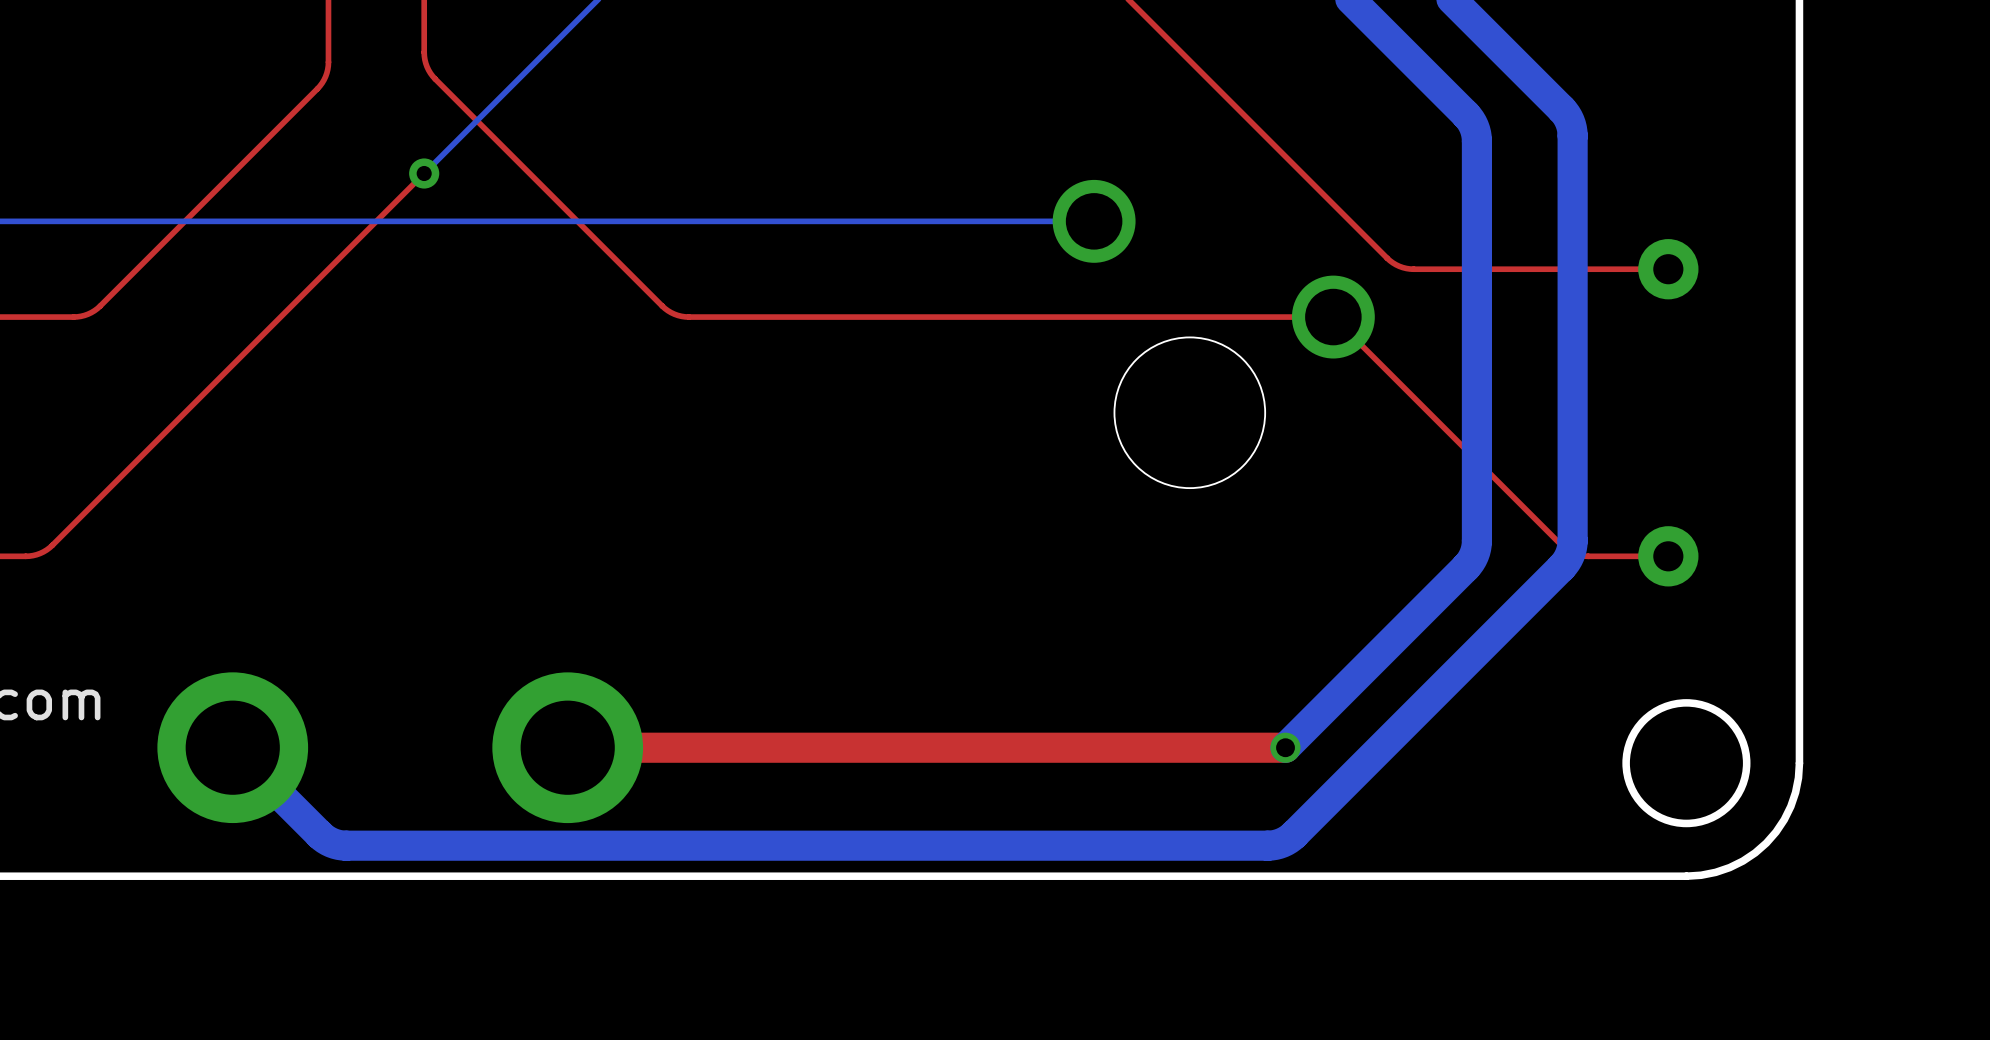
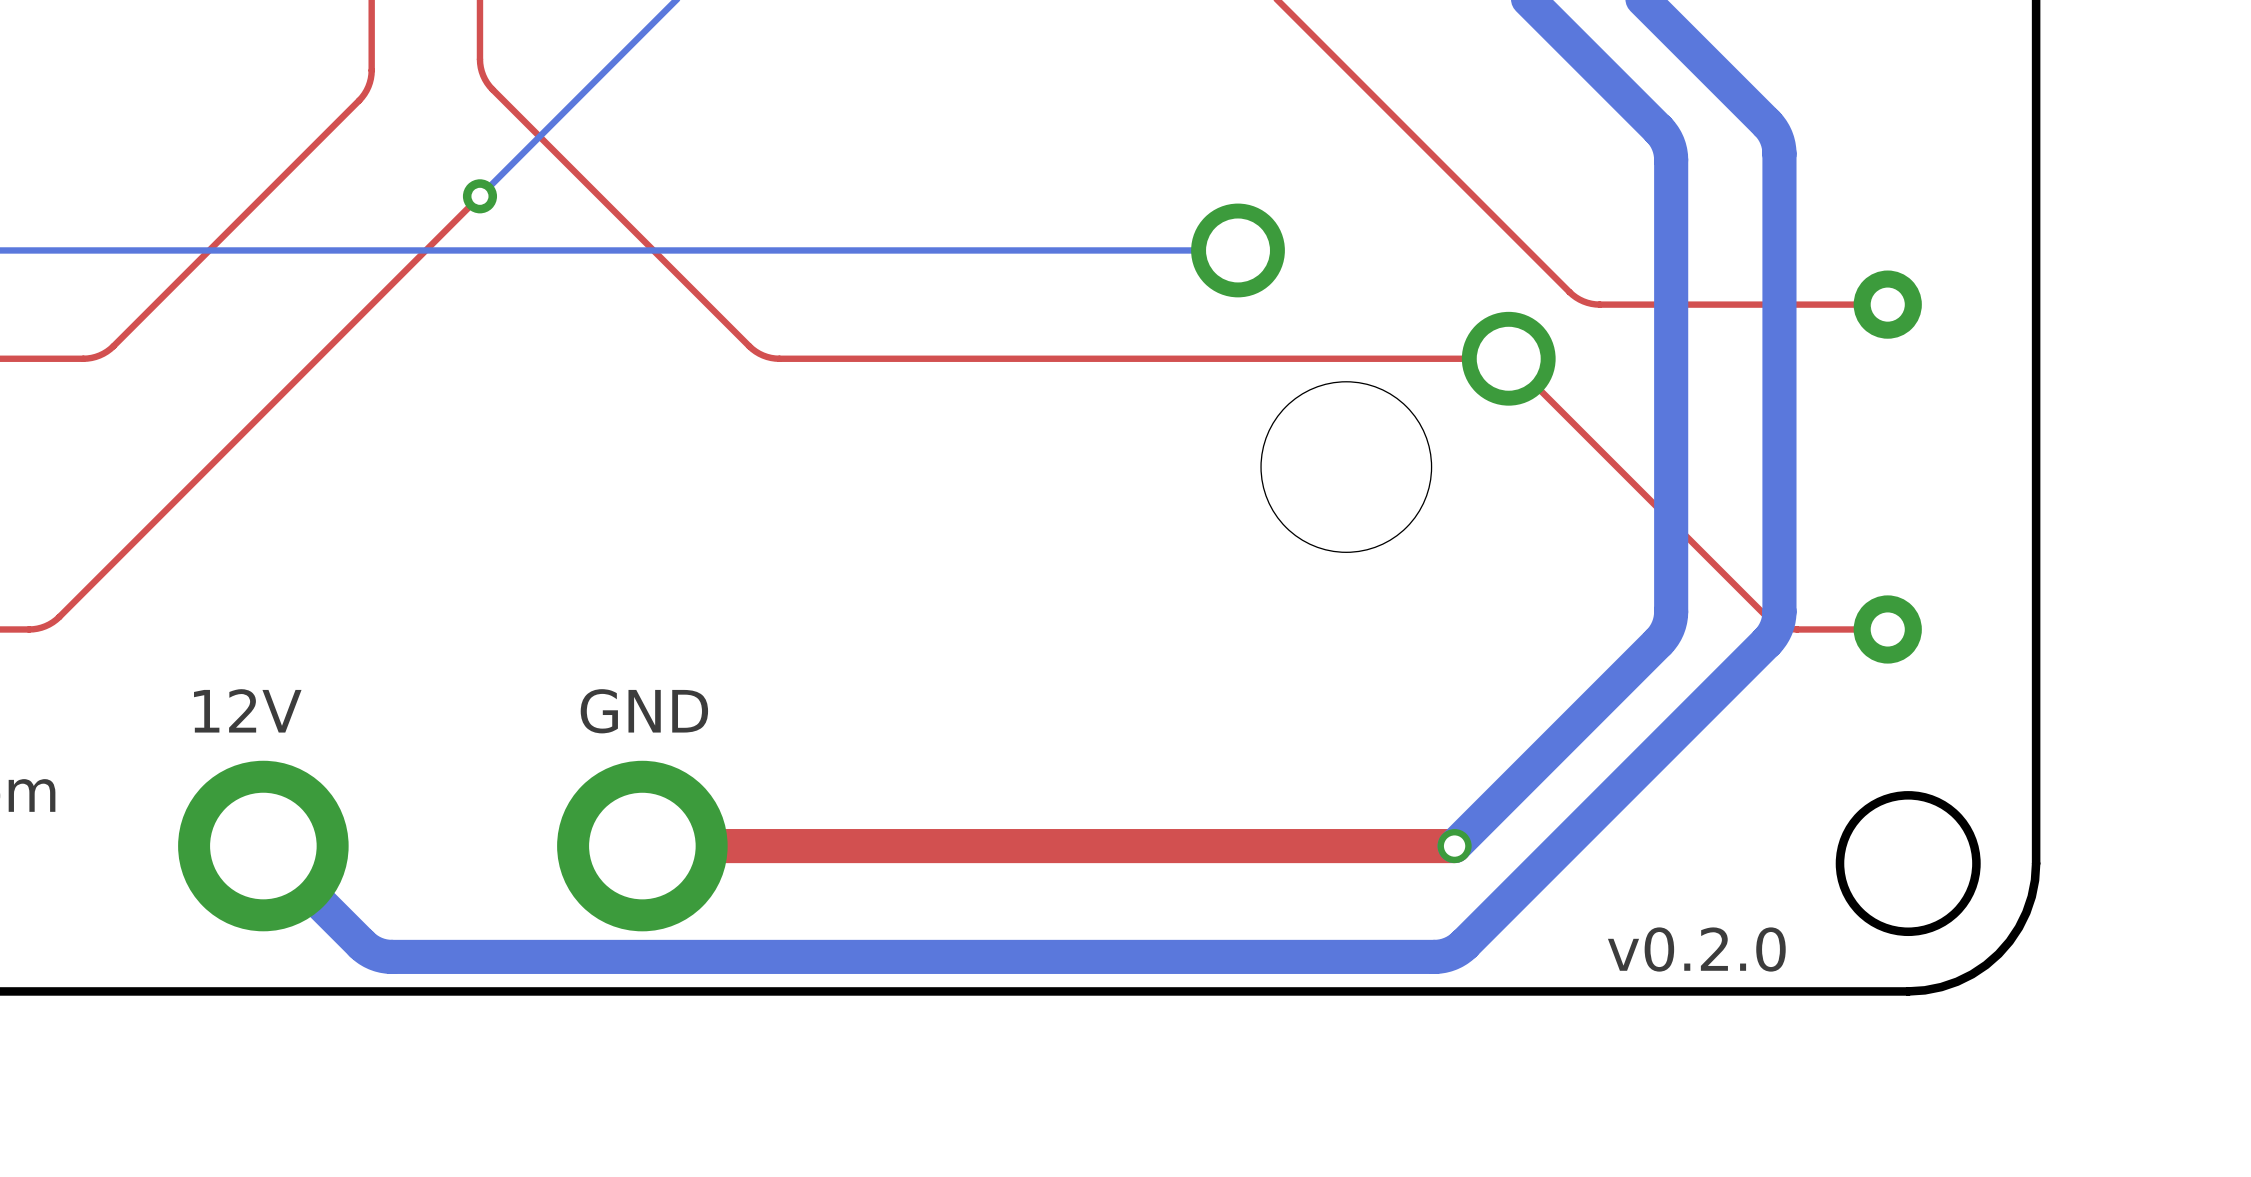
text: none -> 12V (247, 710)
text: none -> GND (644, 711)
text: none -> v0.2.0 (1696, 949)

